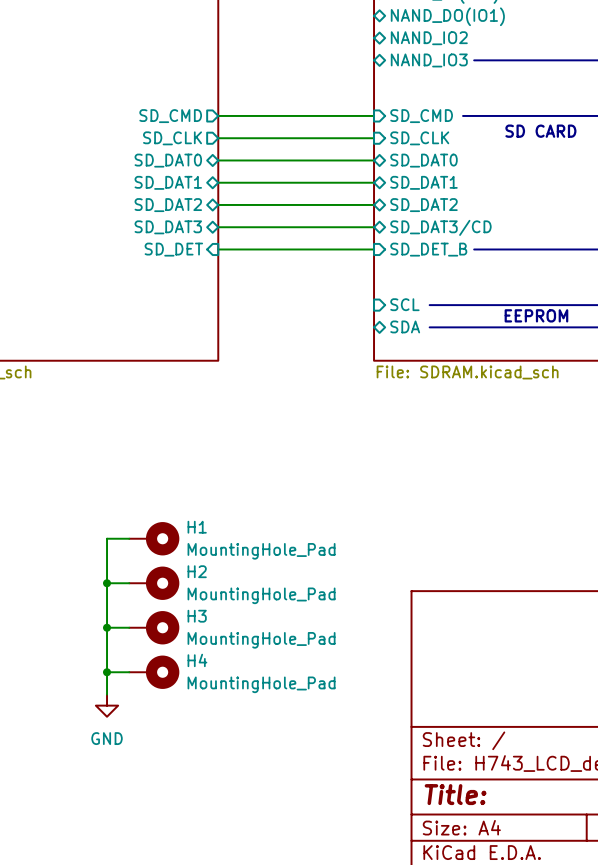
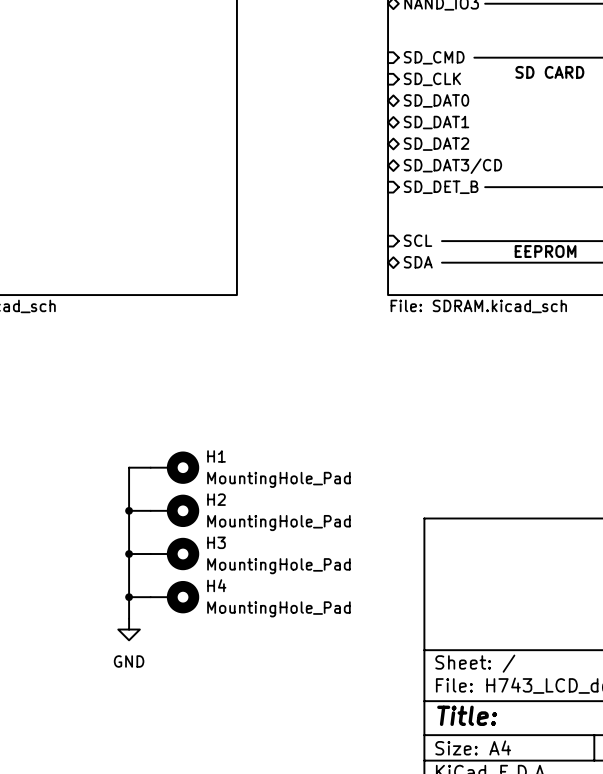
wire: (218, 115) (374, 115) -> none
sheet pin: SD_CMD (170, 116) -> none
sheet pin: SD_CLK (172, 138) -> none
wire: (218, 138) (374, 138) -> none
sheet pin: SD_DAT0 (168, 160) -> none
wire: (218, 160) (374, 160) -> none
sheet pin: SD_DAT1 (168, 182) -> none
wire: (218, 182) (374, 182) -> none
wire: (218, 204) (374, 204) -> none
sheet pin: SD_DAT2 (168, 205) -> none
sheet pin: SD_DAT3 (168, 227) -> none
wire: (218, 227) (374, 227) -> none
sheet pin: SD_DET (173, 249) -> none
wire: (218, 249) (374, 249) -> none

